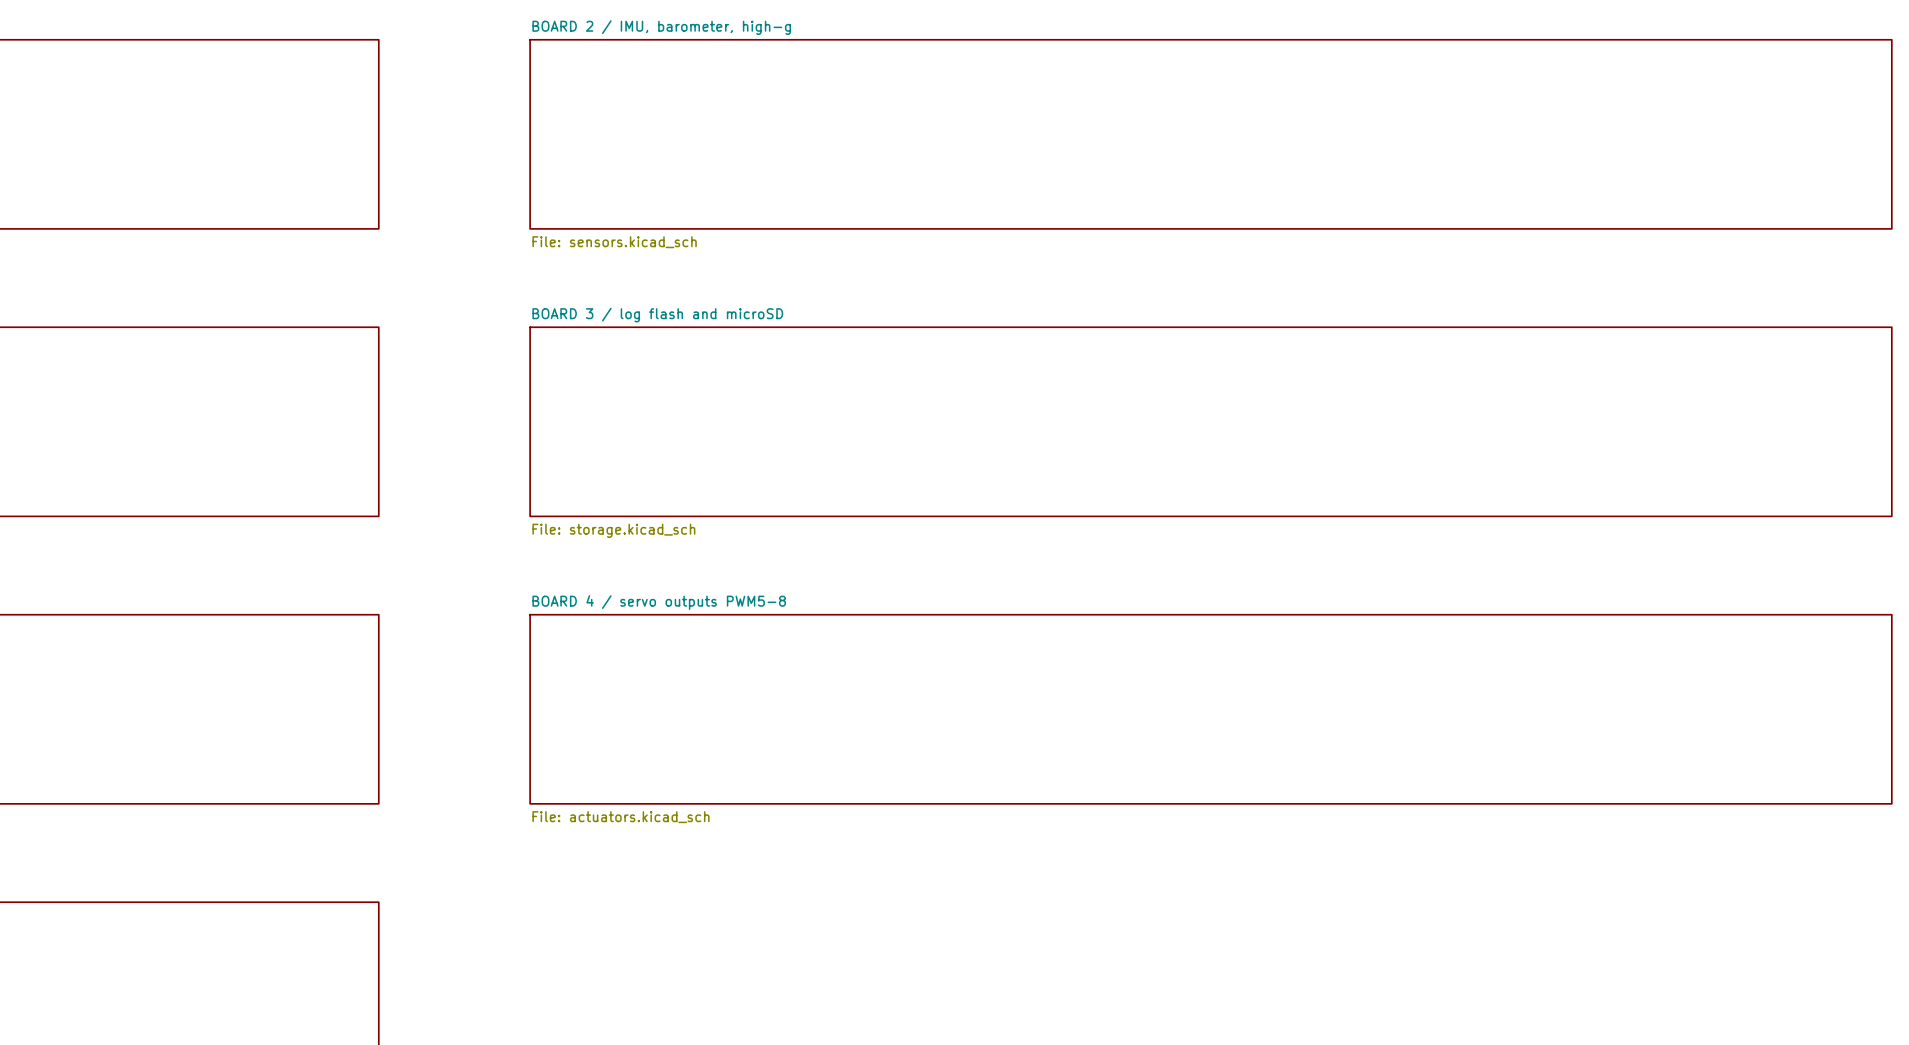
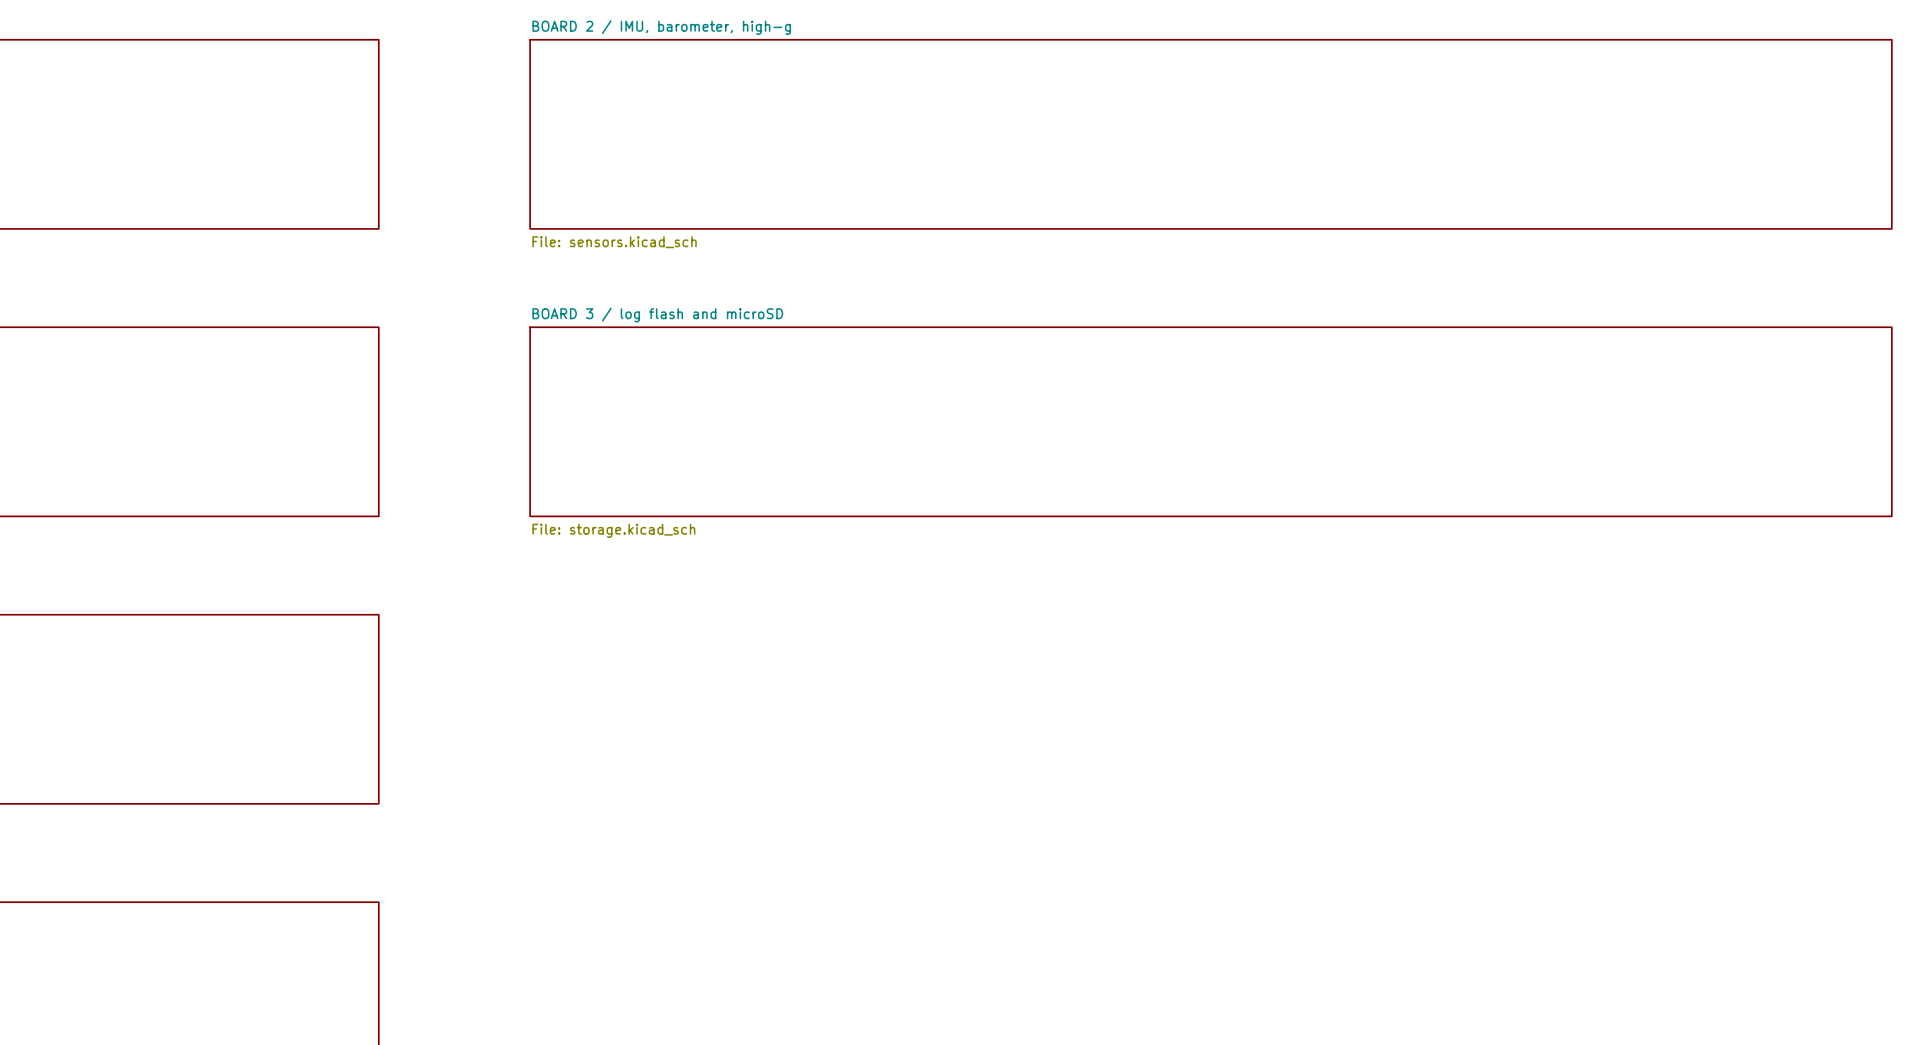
sheet BOARD 4 / servo outputs PWM5-8: File: actuators.kicad_sch (1210, 709) -> none

